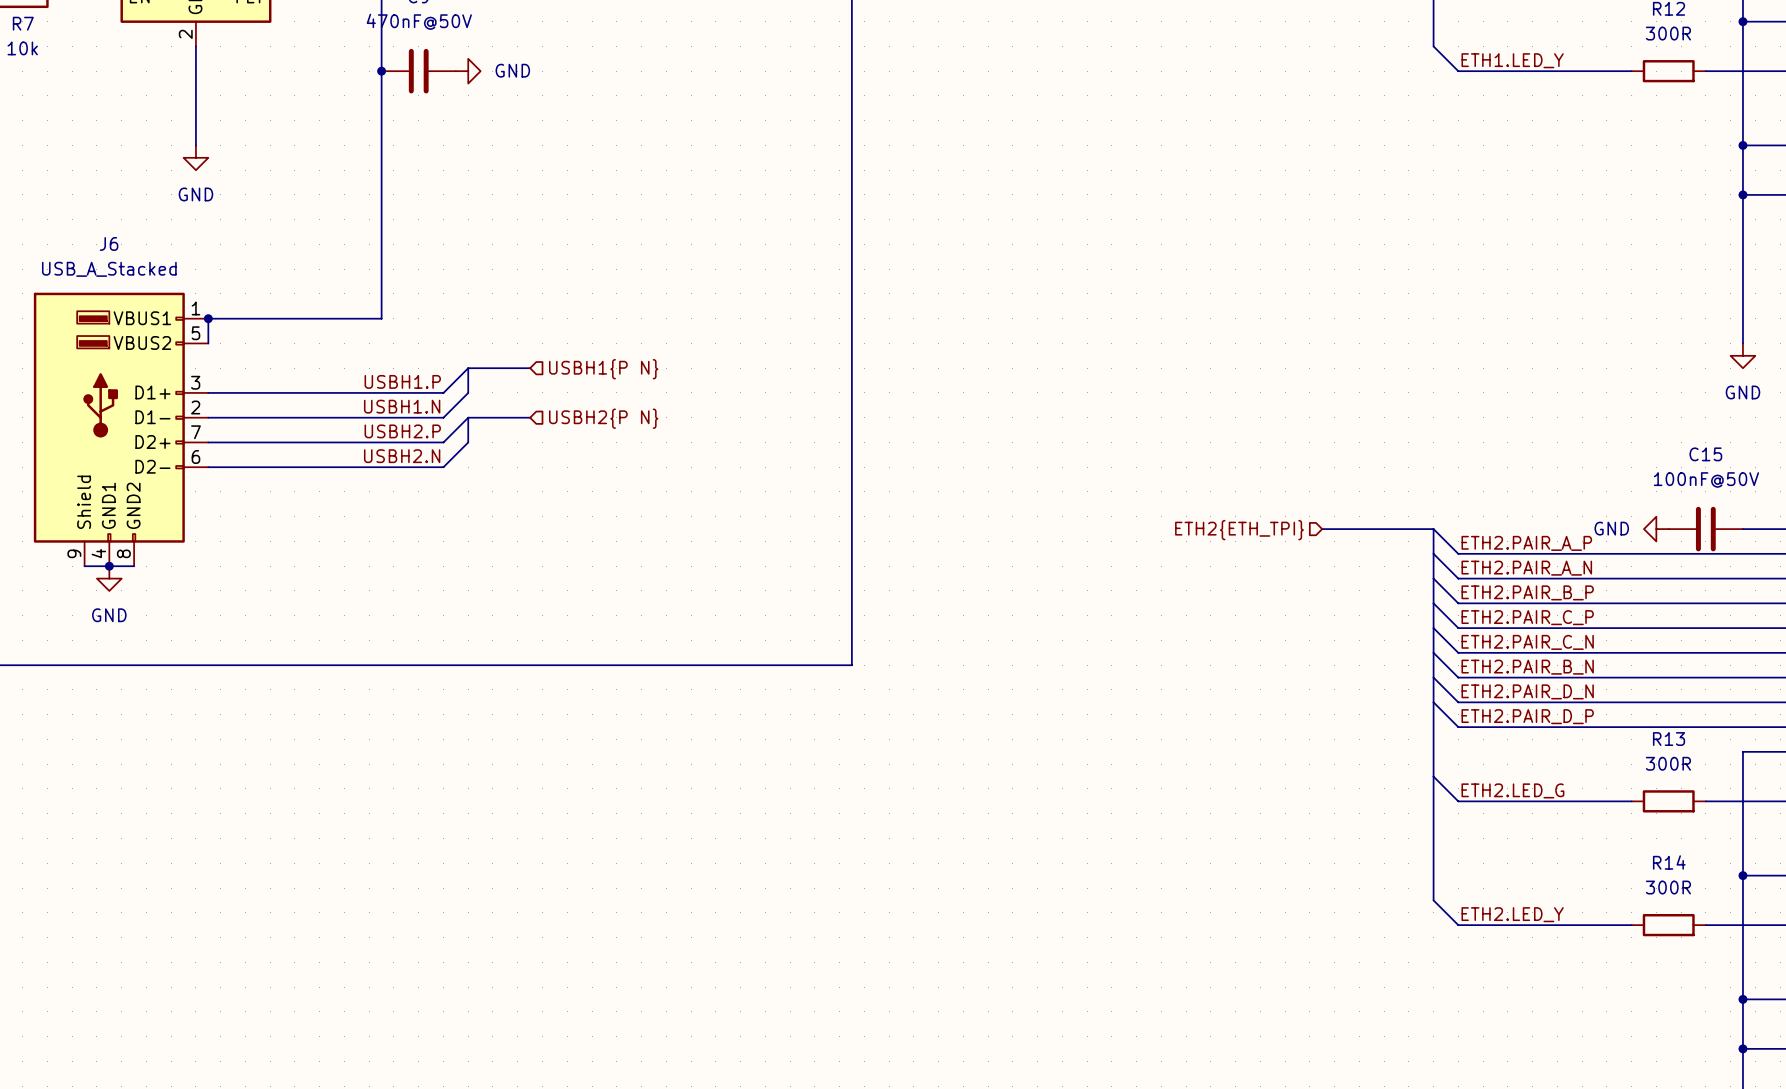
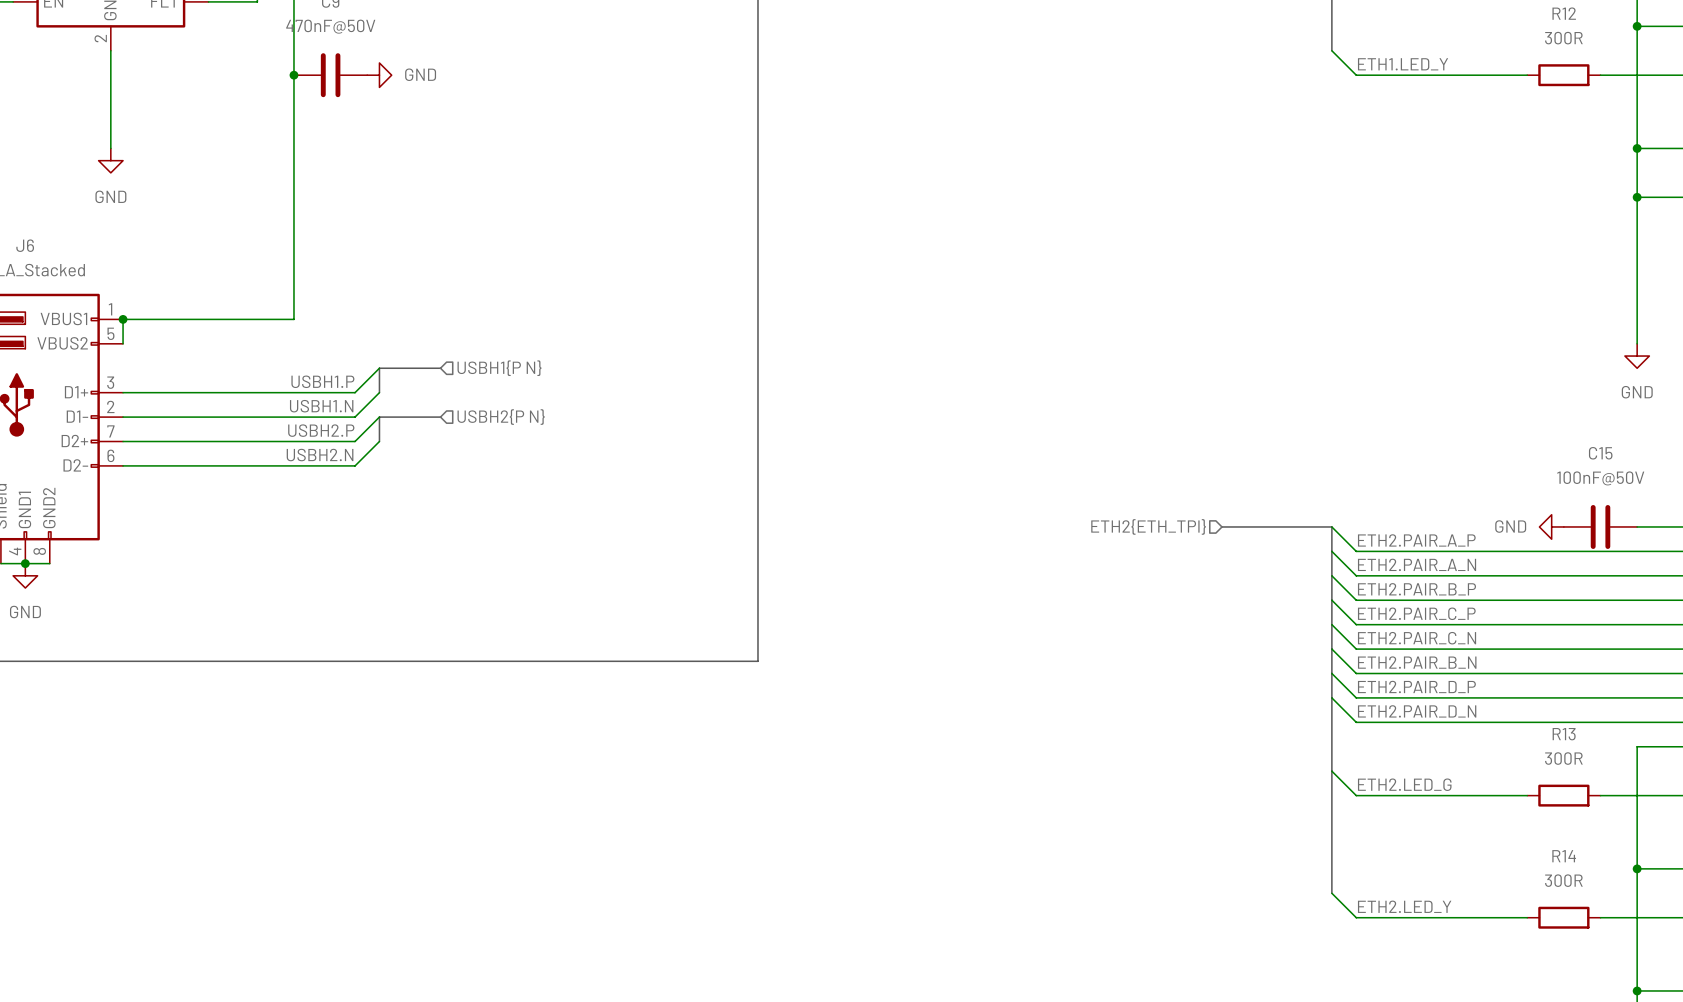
label: ETH2.PAIR_D_N (1527, 691) -> ETH2.PAIR_D_P (1416, 686)
label: ETH2.PAIR_D_P (1527, 716) -> ETH2.PAIR_D_N (1417, 711)

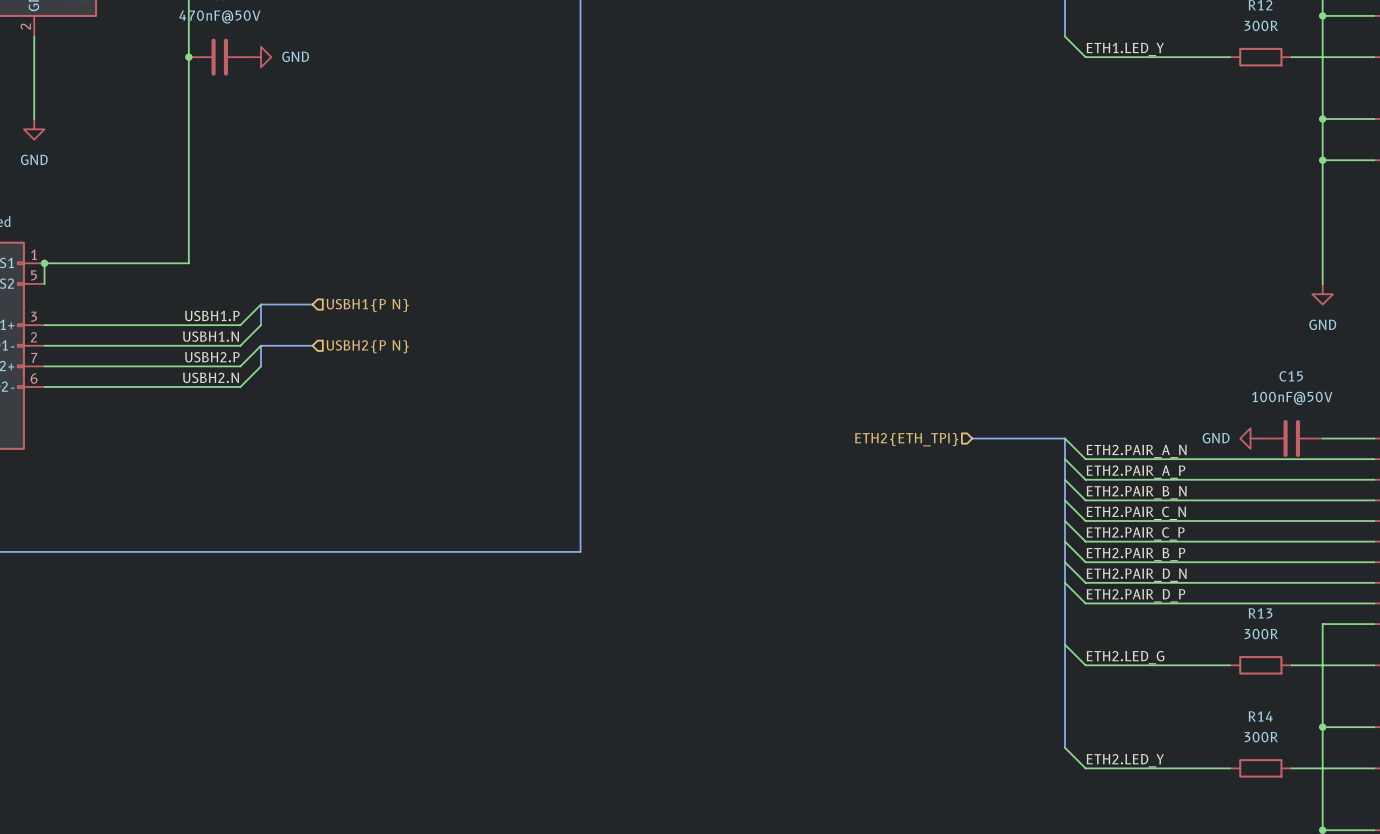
label: ETH2.PAIR_A_P (1416, 540) -> ETH2.PAIR_A_N (1136, 451)
label: ETH2.PAIR_A_N (1417, 564) -> ETH2.PAIR_A_P (1135, 472)
label: ETH2.PAIR_B_P (1416, 589) -> ETH2.PAIR_B_N (1136, 492)
label: ETH2.PAIR_C_P (1416, 613) -> ETH2.PAIR_C_N (1136, 513)
label: ETH2.PAIR_C_N (1417, 638) -> ETH2.PAIR_C_P (1135, 533)
label: ETH2.PAIR_B_N (1417, 662) -> ETH2.PAIR_B_P (1135, 554)
label: ETH2.PAIR_D_P (1416, 686) -> ETH2.PAIR_D_N (1136, 575)
label: ETH2.PAIR_D_N (1417, 711) -> ETH2.PAIR_D_P (1135, 595)

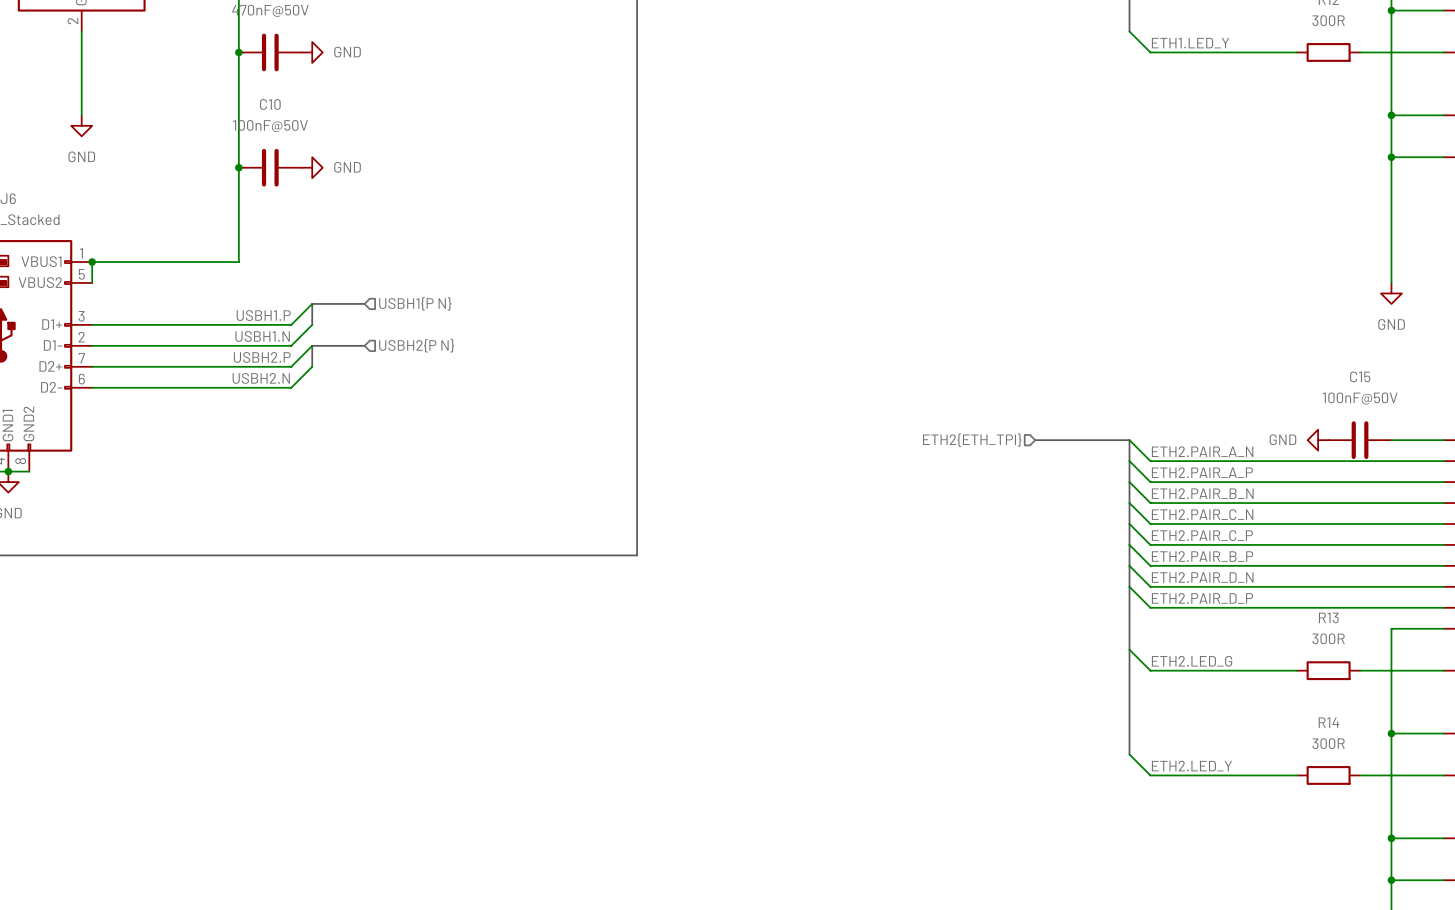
junction: none -> (238, 167)
C10: none -> 100nF@50V (270, 167)
power symbol: none -> GND (312, 167)

